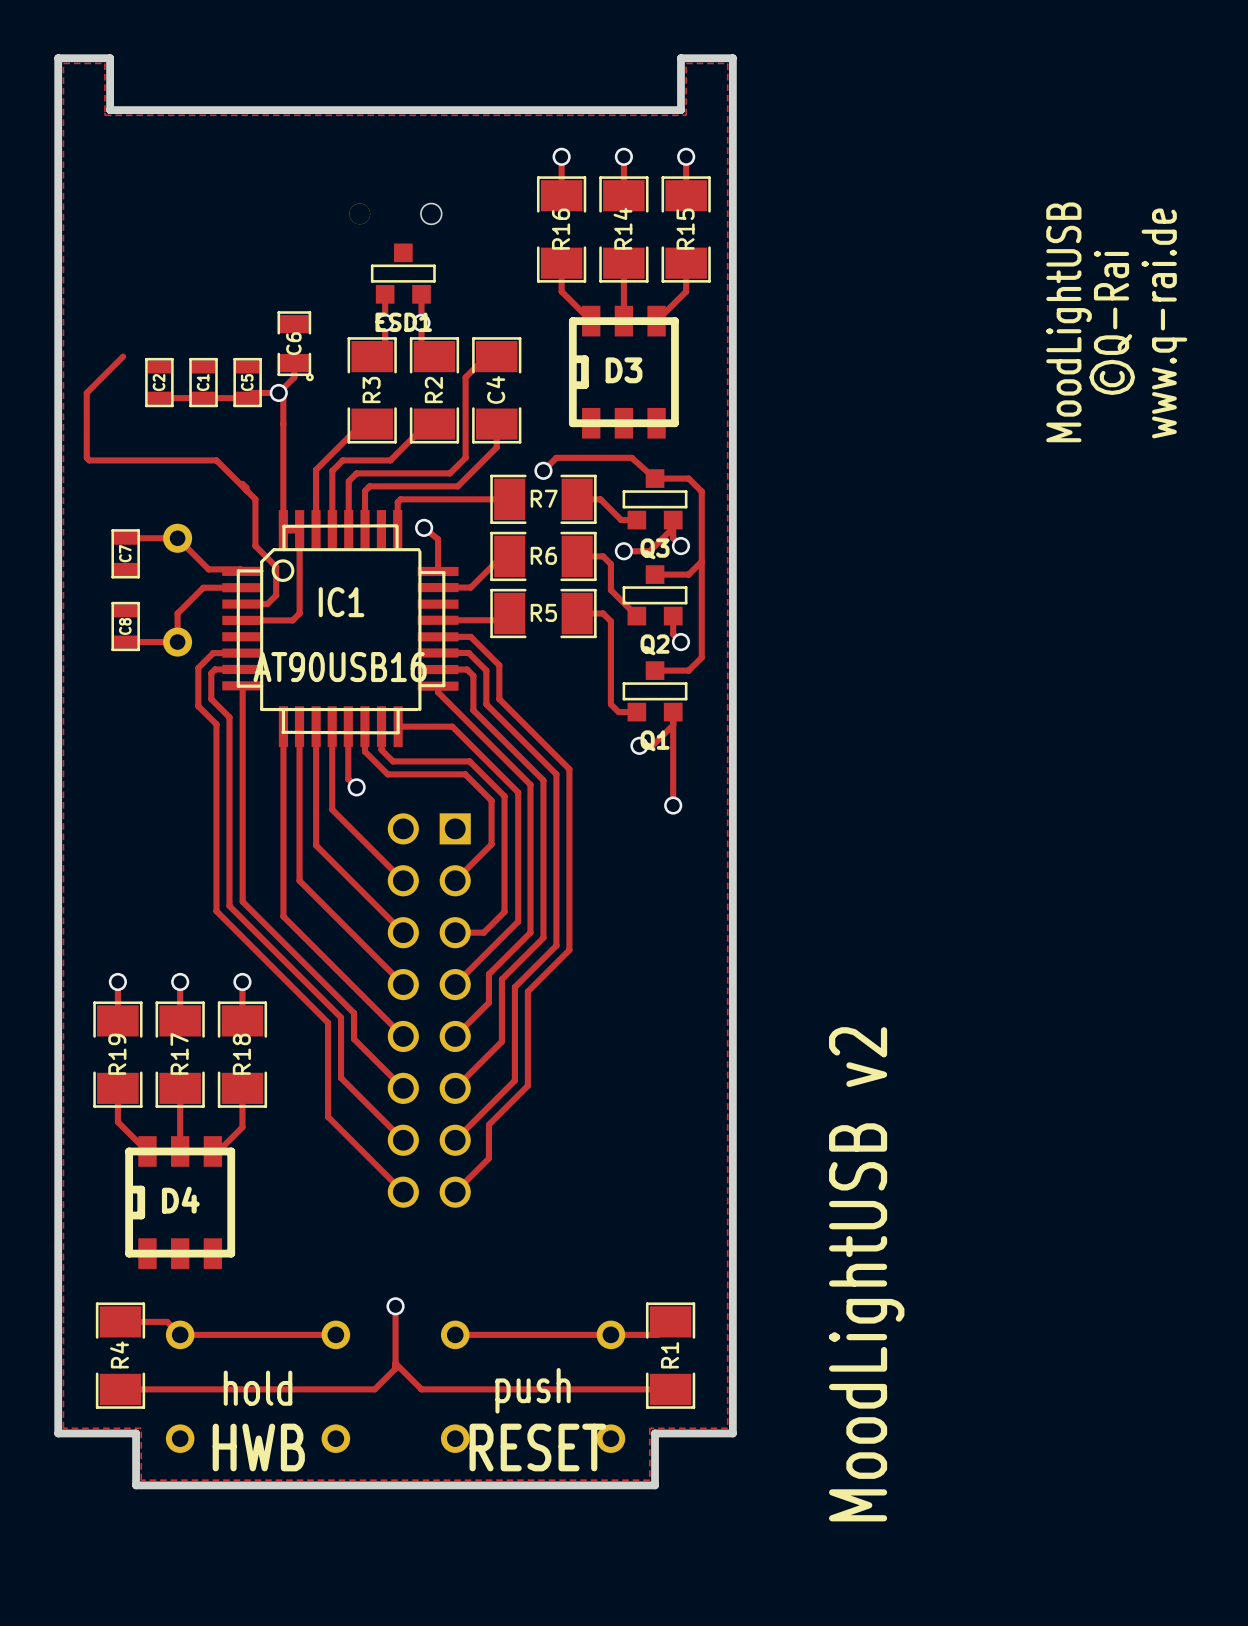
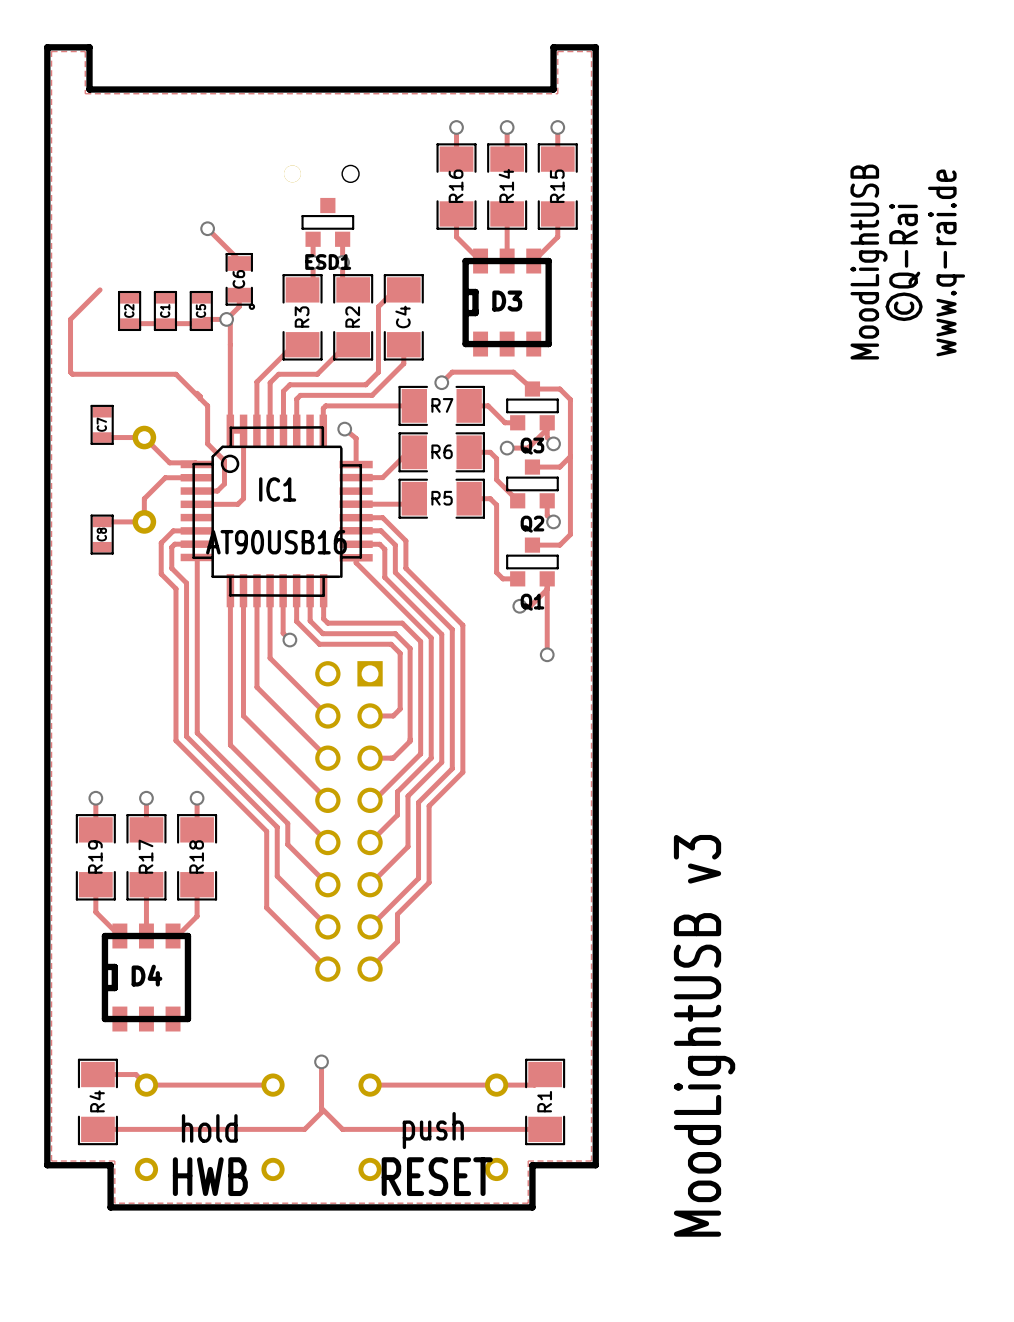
track: none -> (207, 228) (239, 260) (239, 263)
via: none -> (207, 228)
C7 position: (125, 553) -> (102, 424)
C8 position: (125, 626) -> (102, 534)
track: (398, 726) (452, 726) (518, 792) (518, 921) (455, 984) -> (323, 590) (323, 618) (327, 623) (402, 623) (420, 641) (420, 753) (374, 800) (370, 800)
track: (381, 750) (392, 761) (469, 761) (504, 797) -> (310, 609) (310, 620) (322, 633) (395, 633) (410, 648)
track: (364, 751) (387, 774) (465, 774) (491, 800) (491, 844) (455, 880) -> (296, 610) (296, 621) (319, 644) (391, 644) (400, 653) (400, 709) (393, 715) (370, 715)
text: MoodLightUSB v2 (866, 1274) -> MoodLightUSB v3 (704, 1035)

